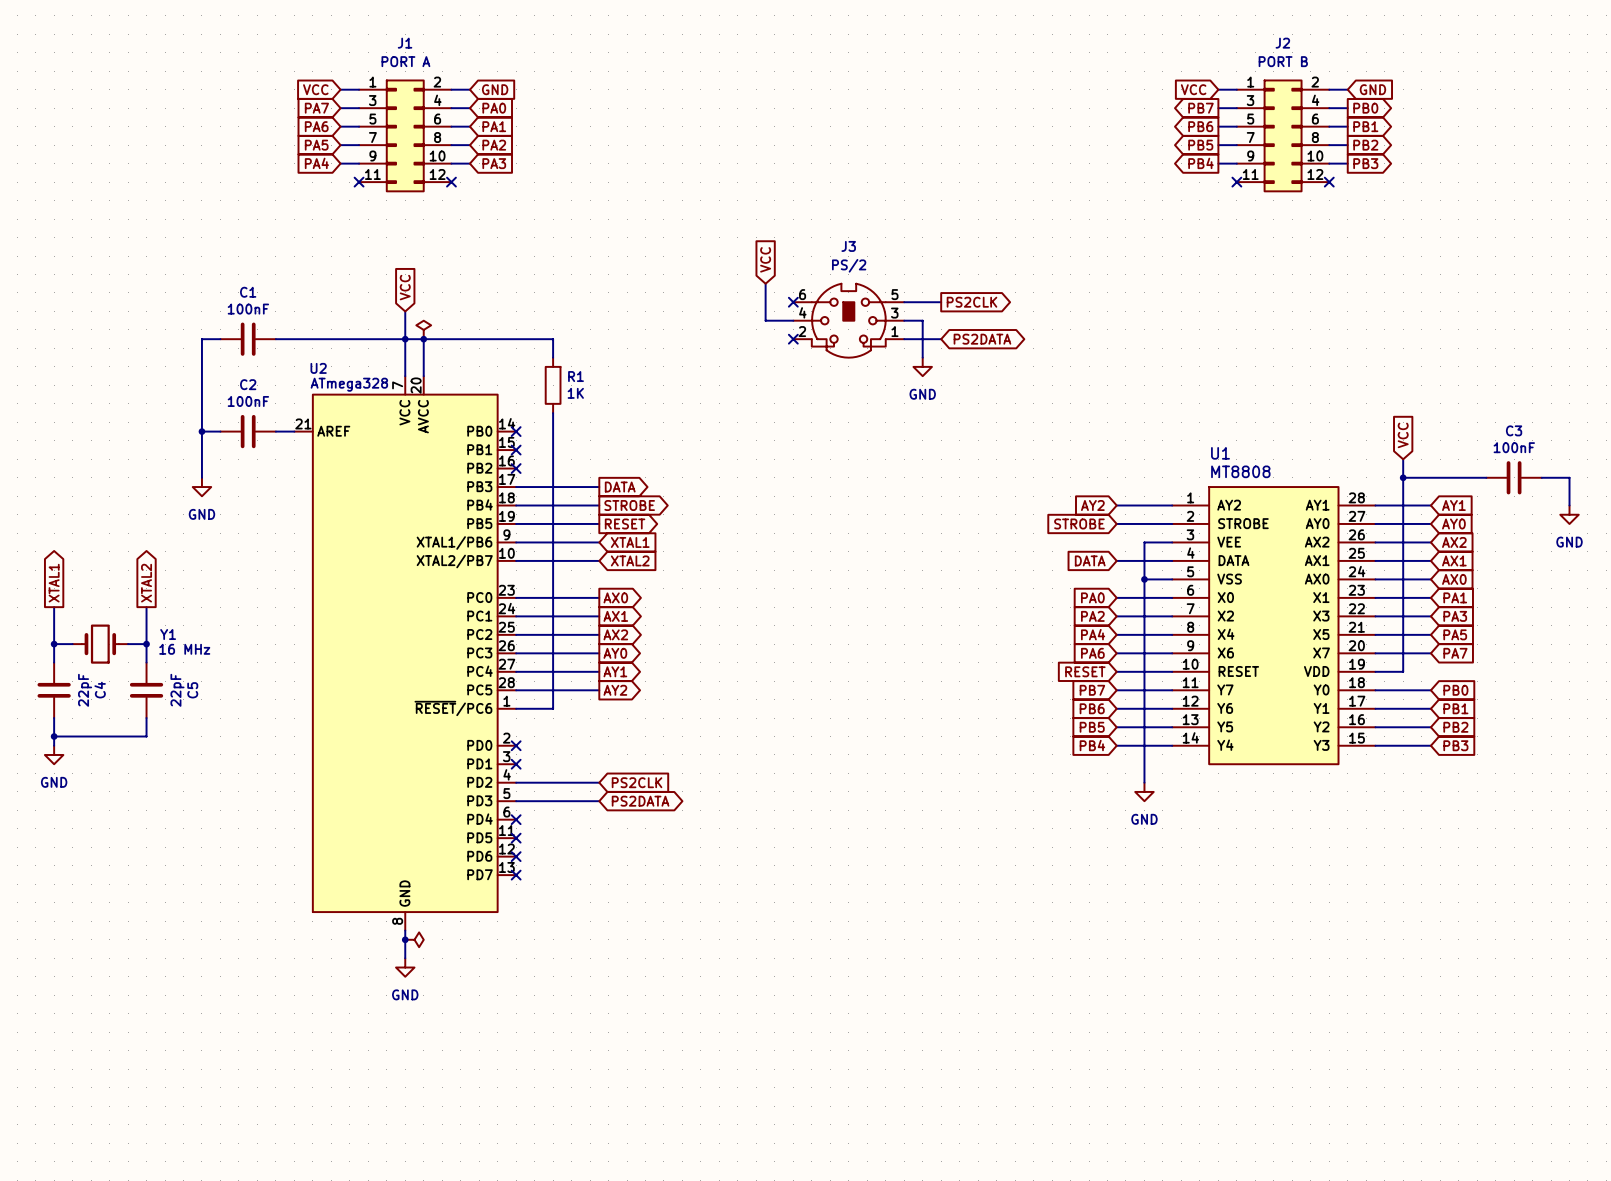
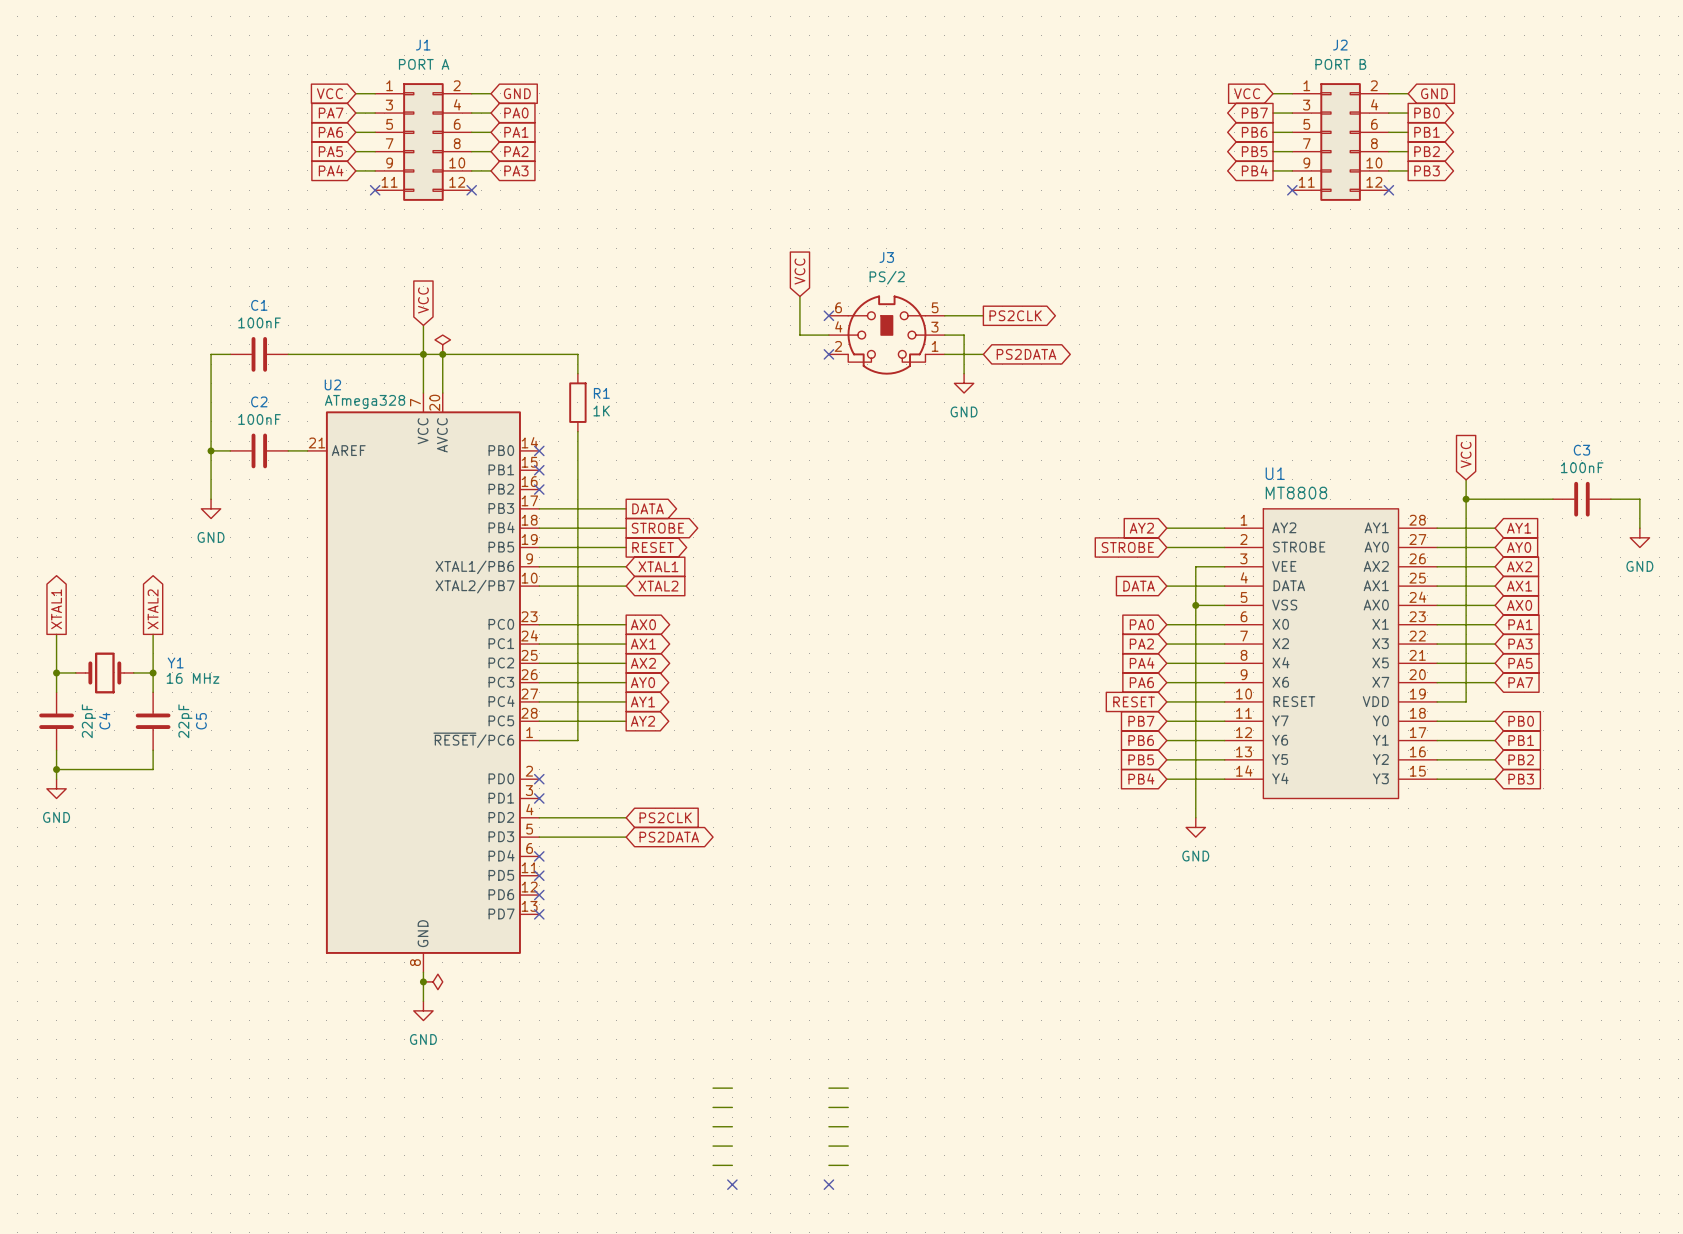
wire: none -> (713, 1088) (732, 1088)
wire: none -> (828, 1088) (848, 1088)
wire: none -> (713, 1107) (732, 1107)
wire: none -> (828, 1107) (848, 1107)
wire: none -> (713, 1126) (732, 1126)
wire: none -> (828, 1126) (848, 1126)
wire: none -> (713, 1146) (732, 1146)
wire: none -> (828, 1146) (848, 1146)
wire: none -> (713, 1165) (732, 1165)
wire: none -> (828, 1165) (848, 1165)
no-connect mark: none -> (732, 1184)
no-connect mark: none -> (828, 1184)

